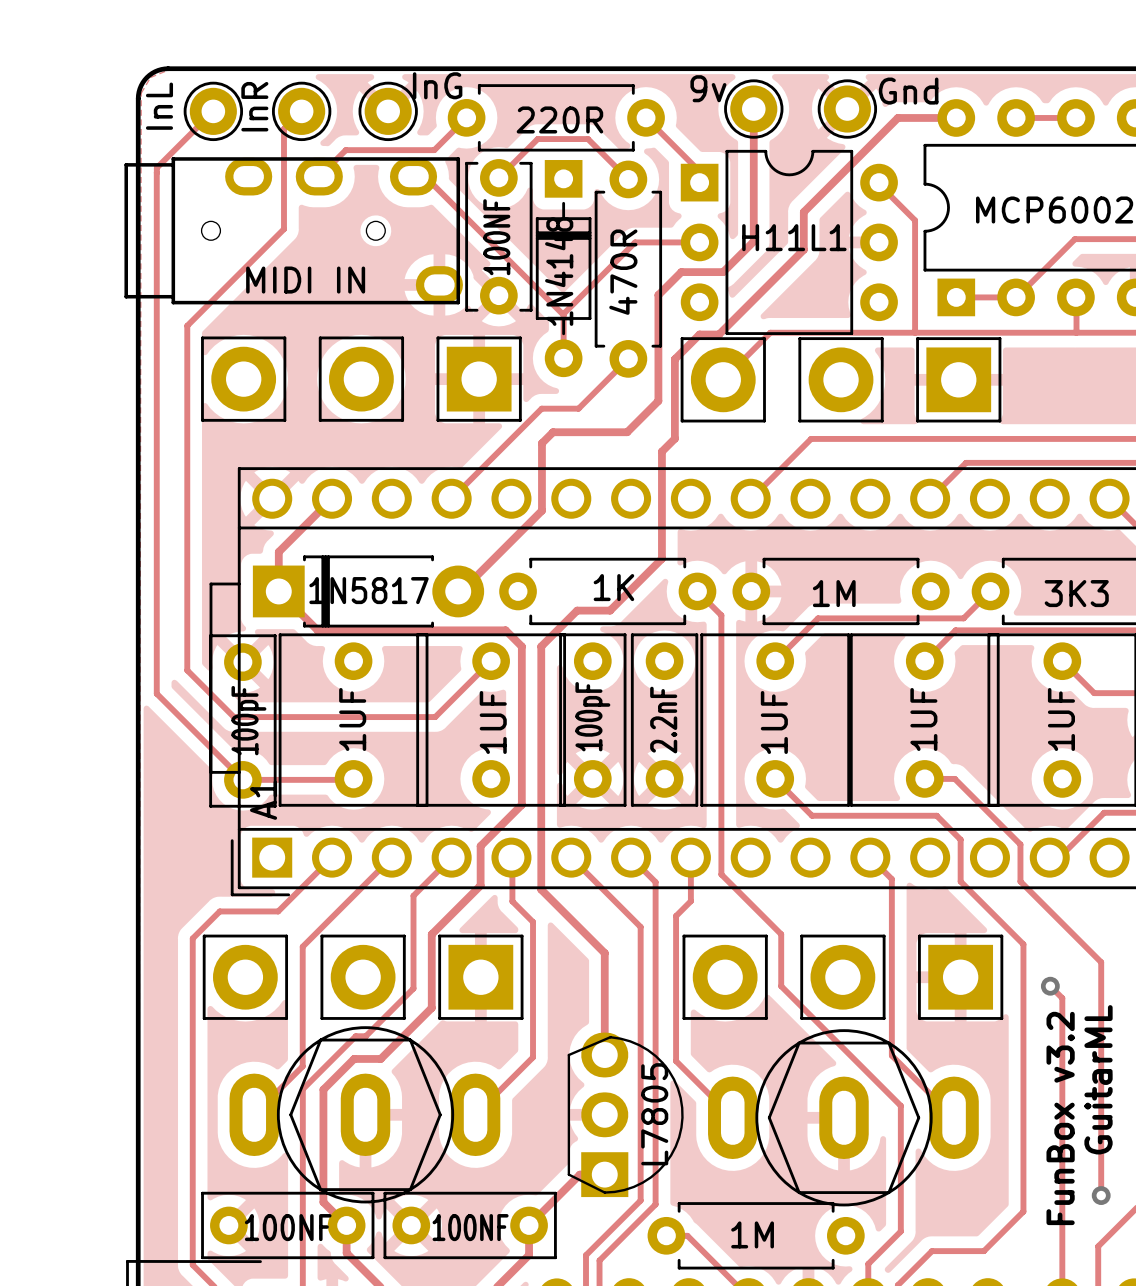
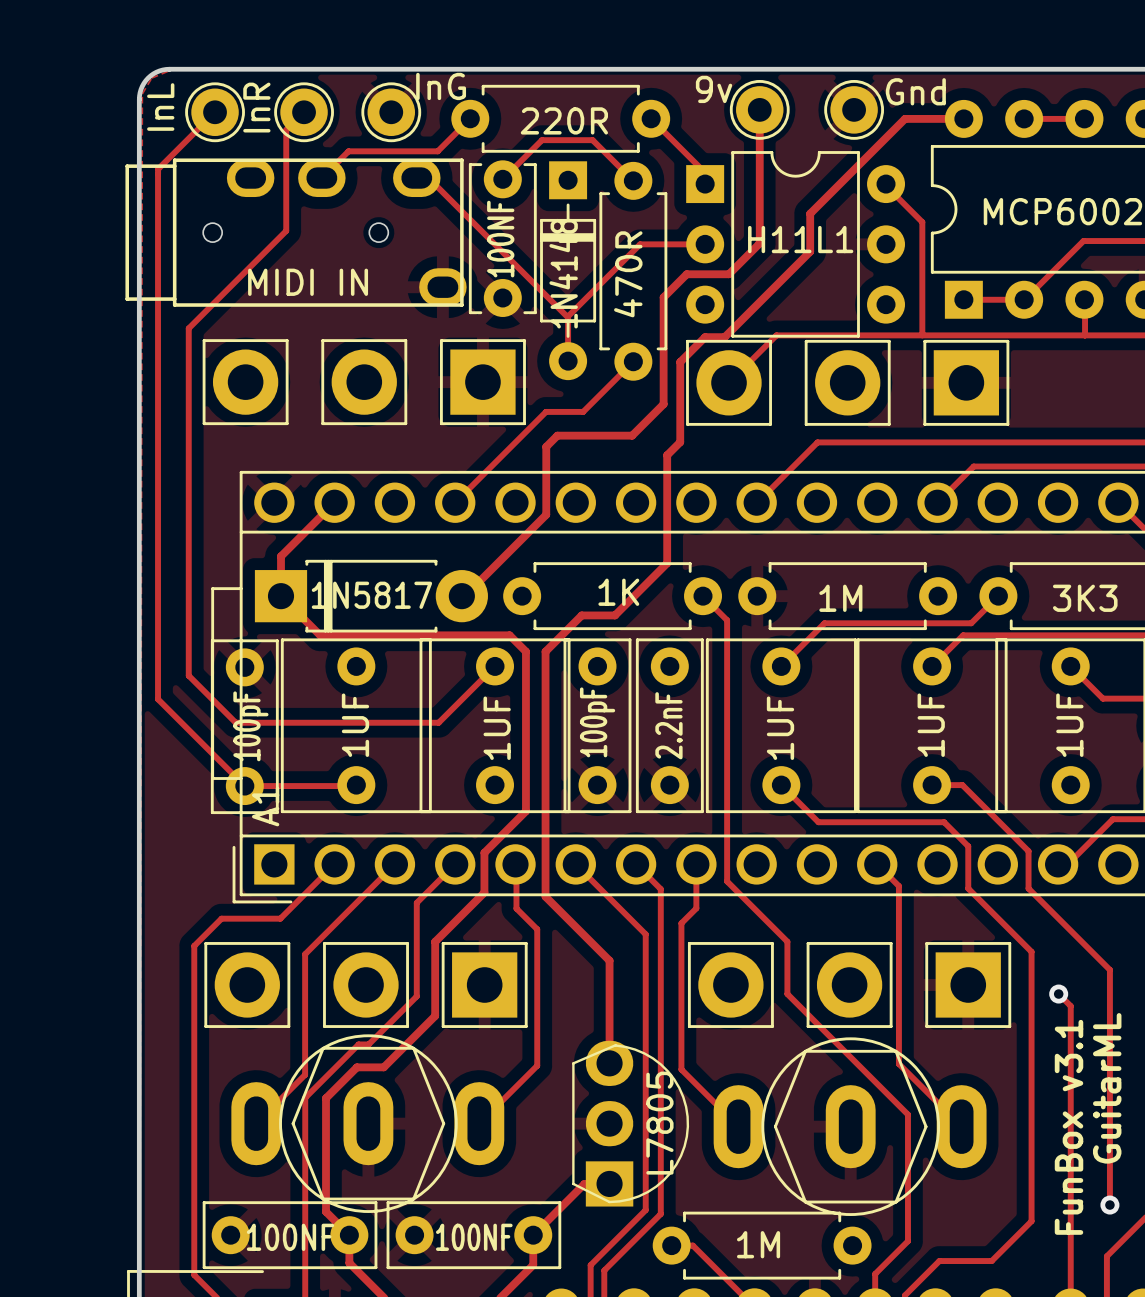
text: FunBox v3.2 (1060, 1118) -> FunBox v3.1 (1069, 1127)

